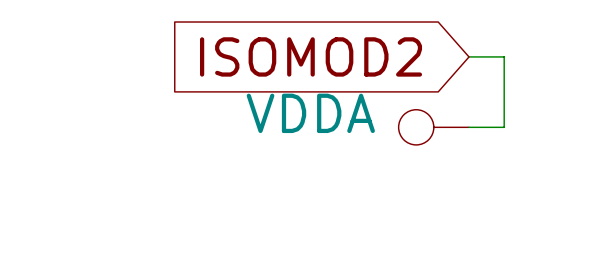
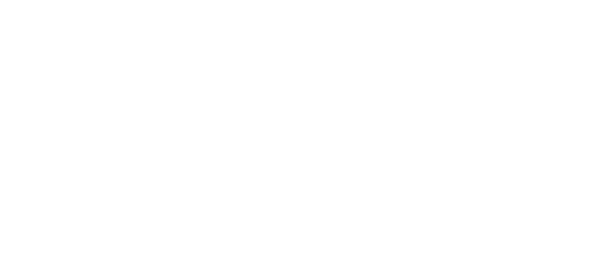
global label: ISOMOD2 (311, 56) -> none
wire: (469, 56) (504, 56) (504, 127) (469, 127) -> none
power symbol: VDDA (433, 127) -> none

